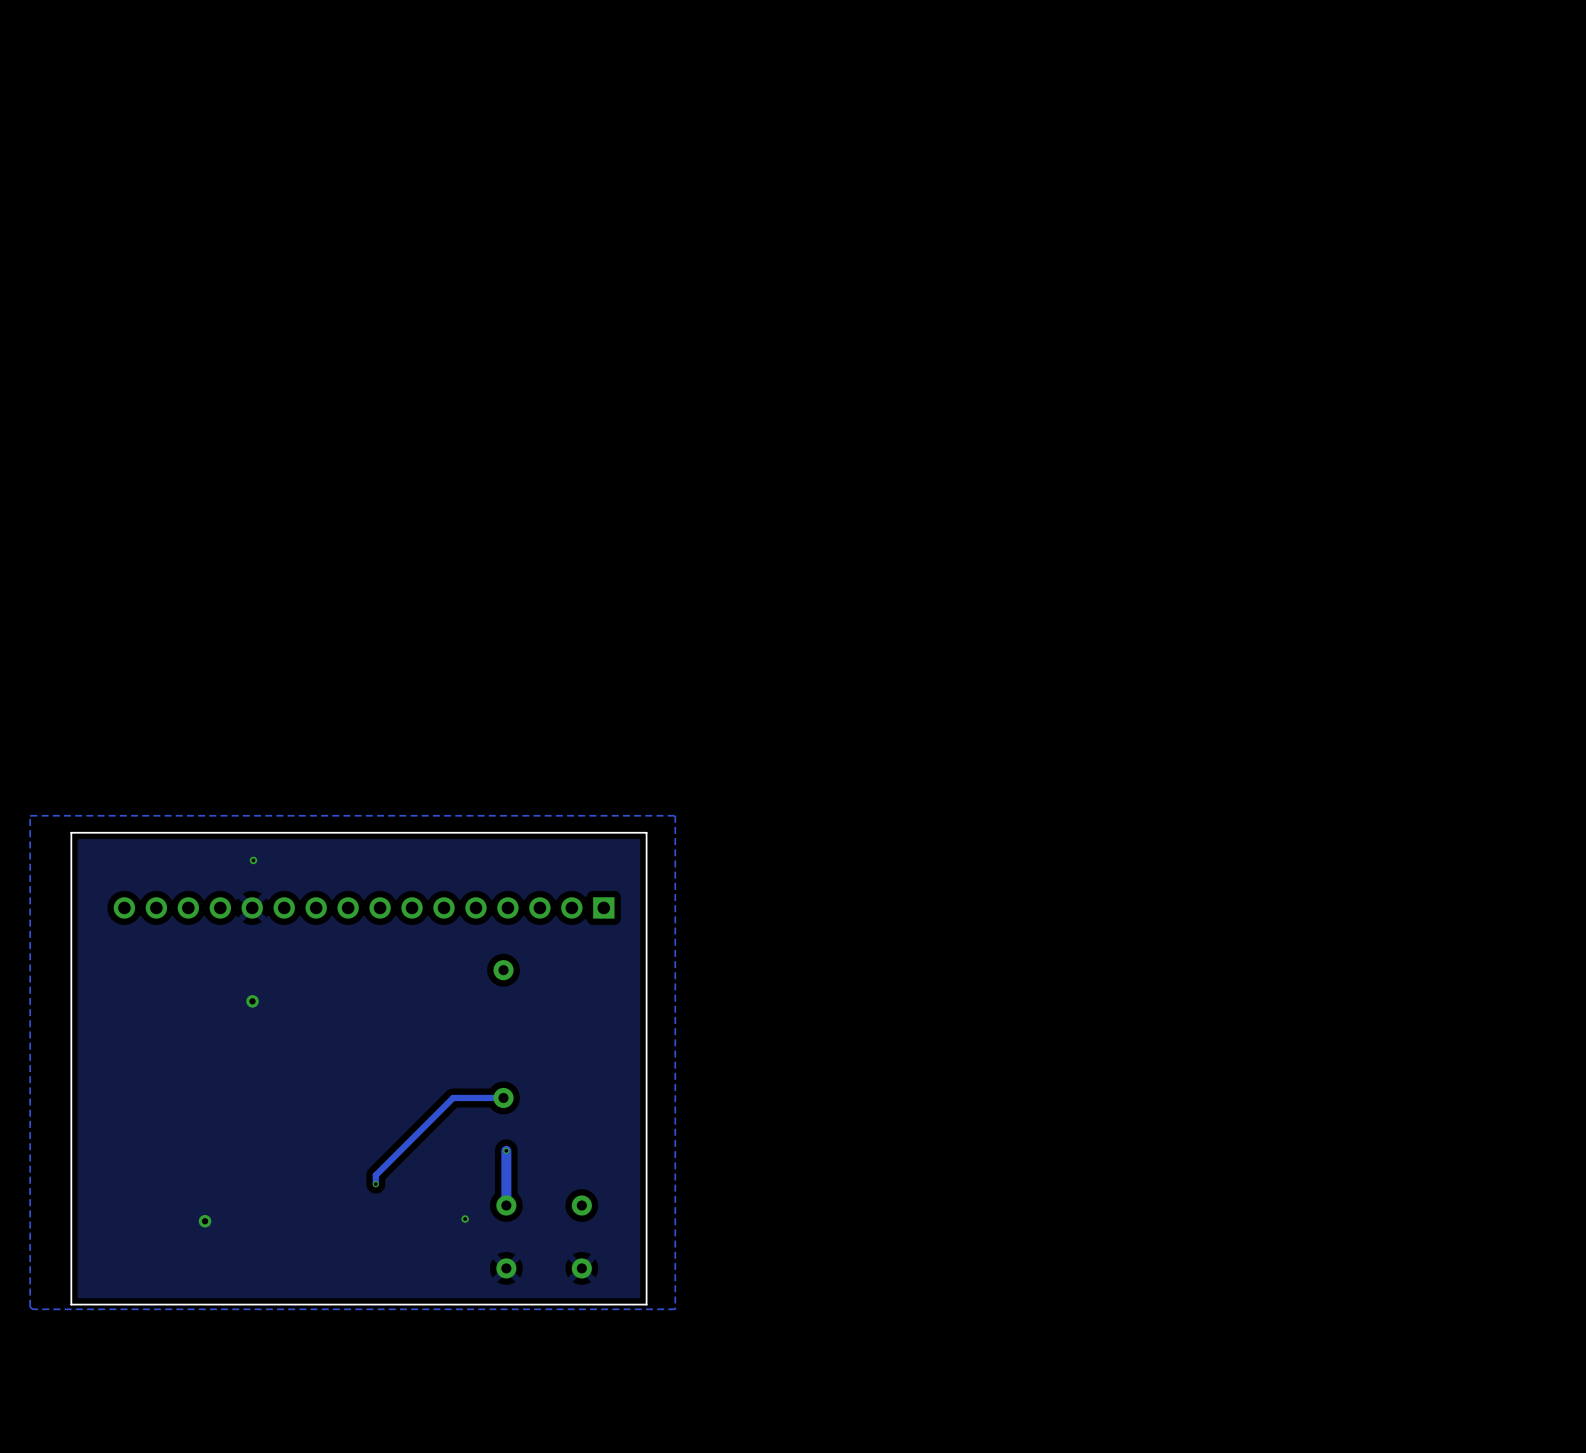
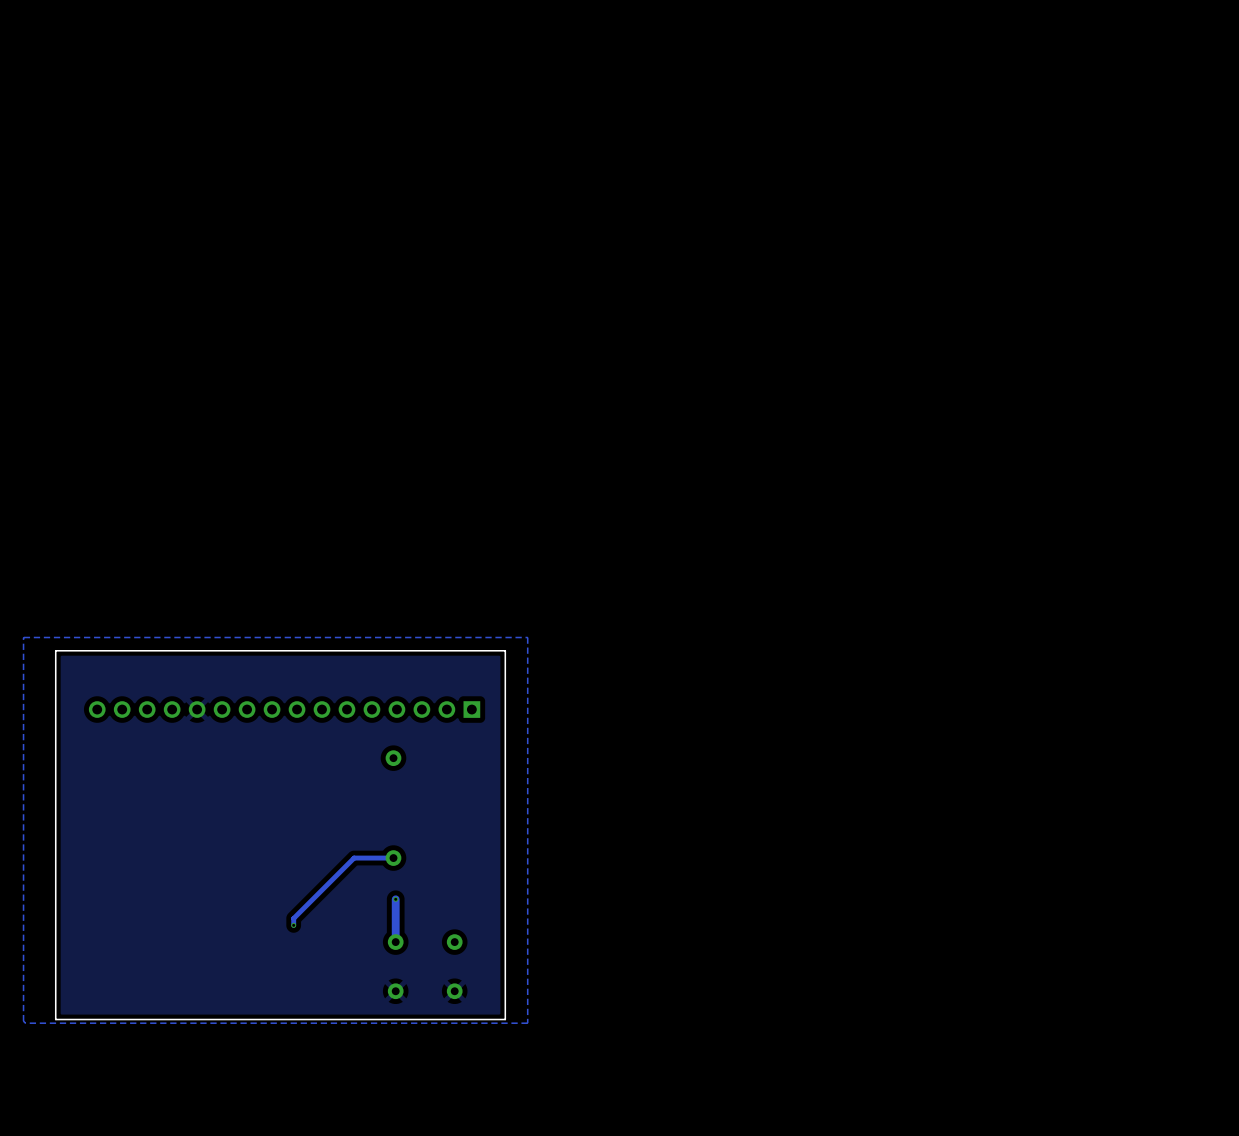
via: (253, 860) -> none
via: (252, 1001) -> none
via: (465, 1219) -> none
via: (205, 1221) -> none

